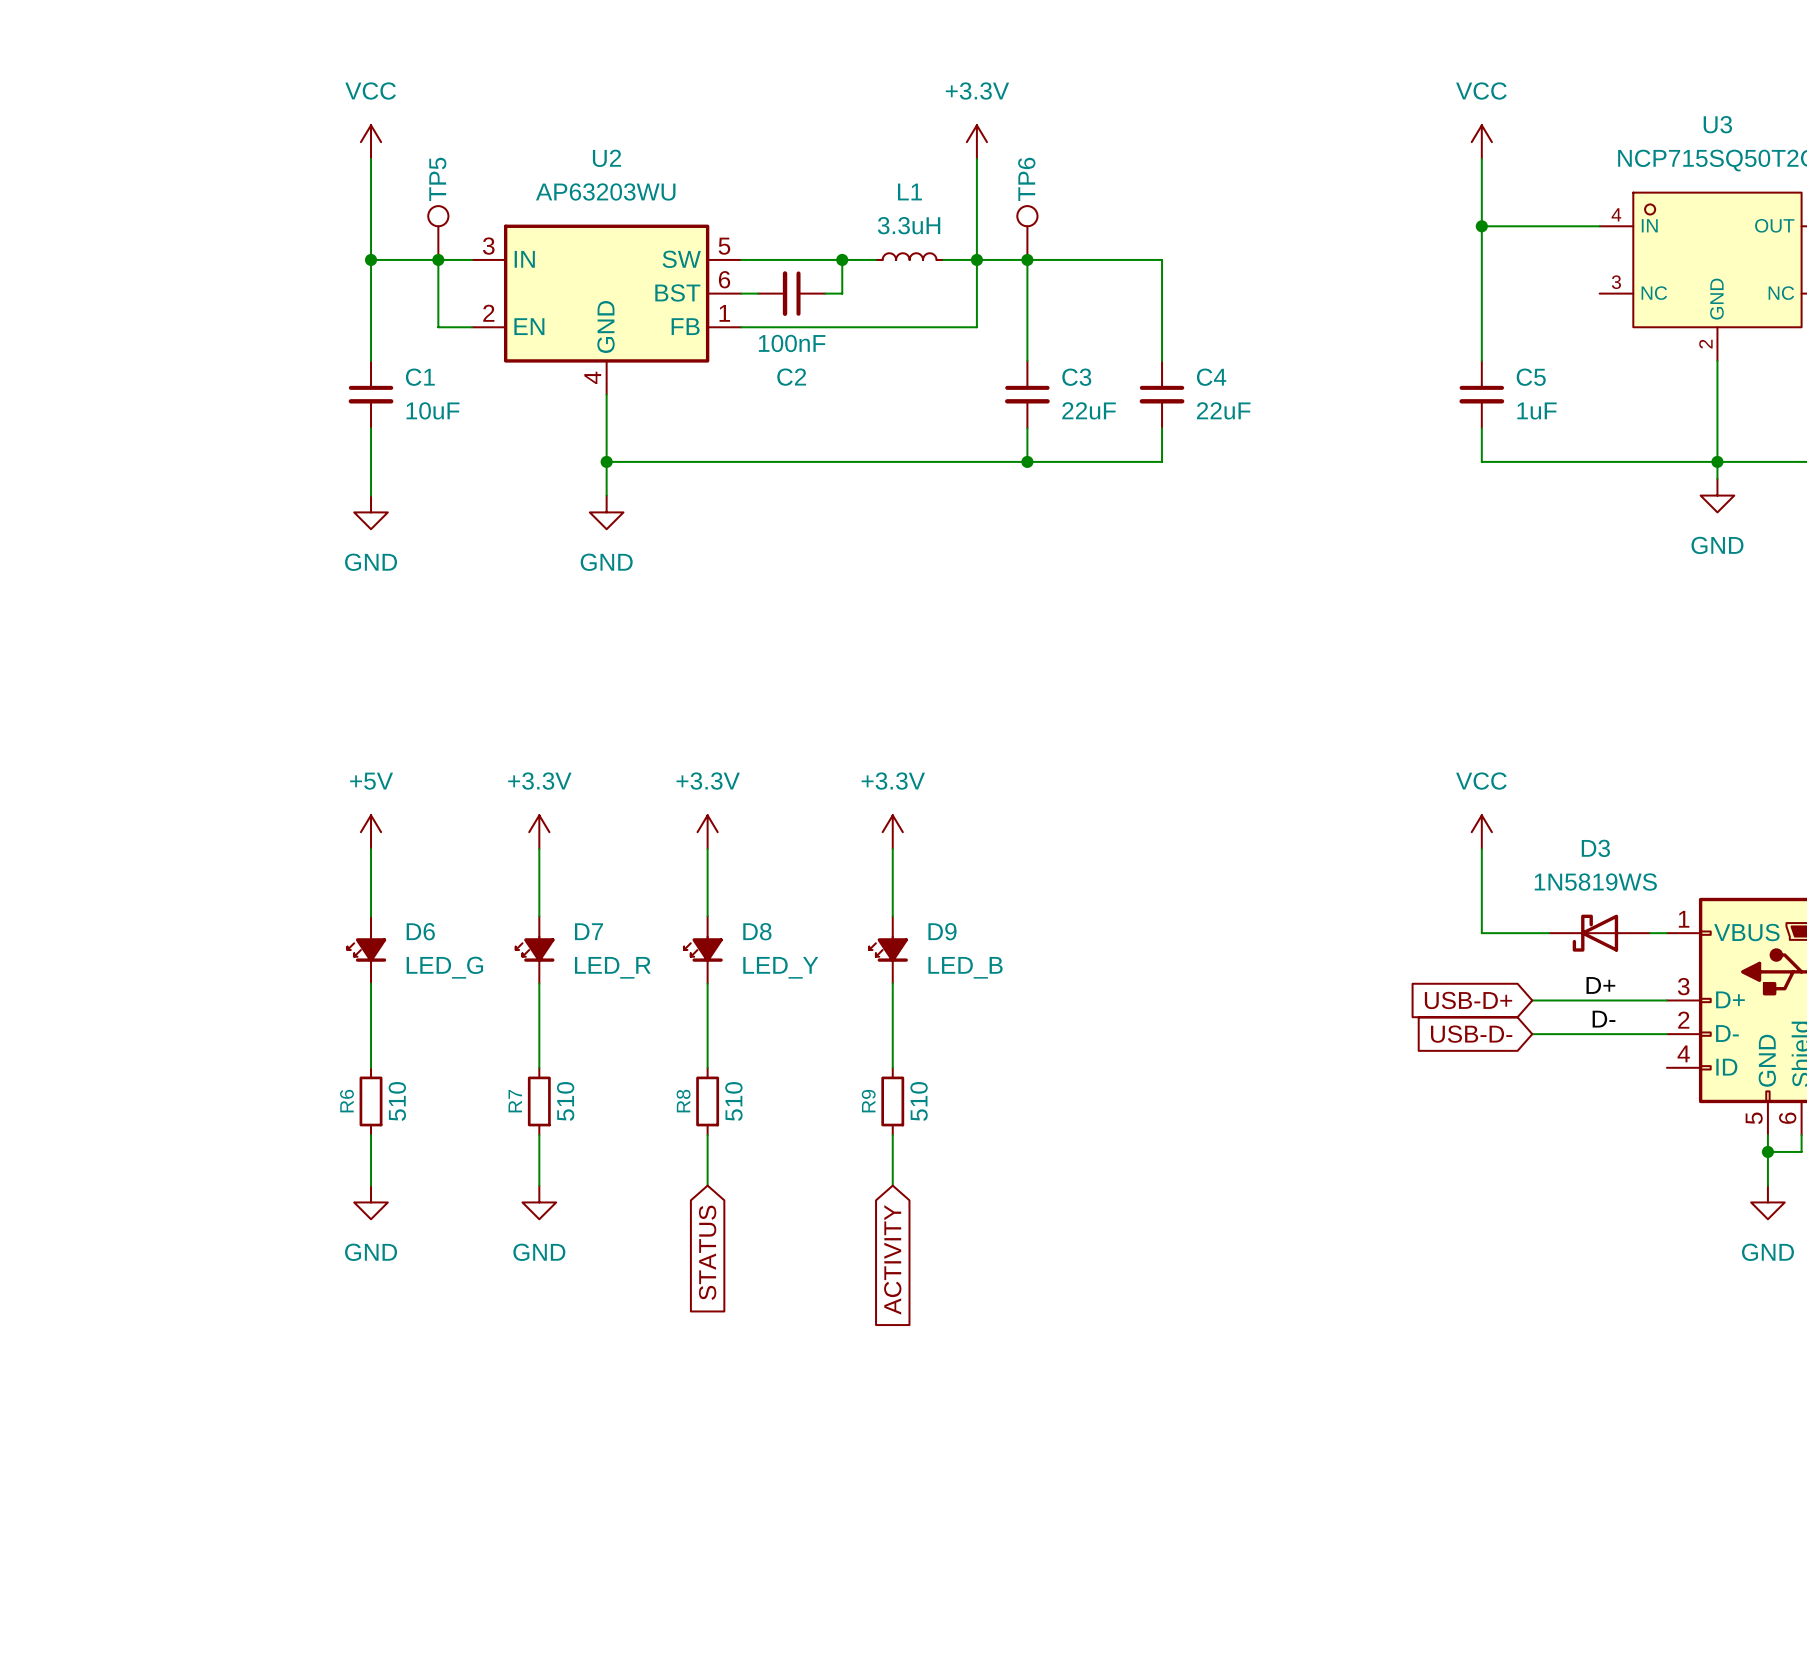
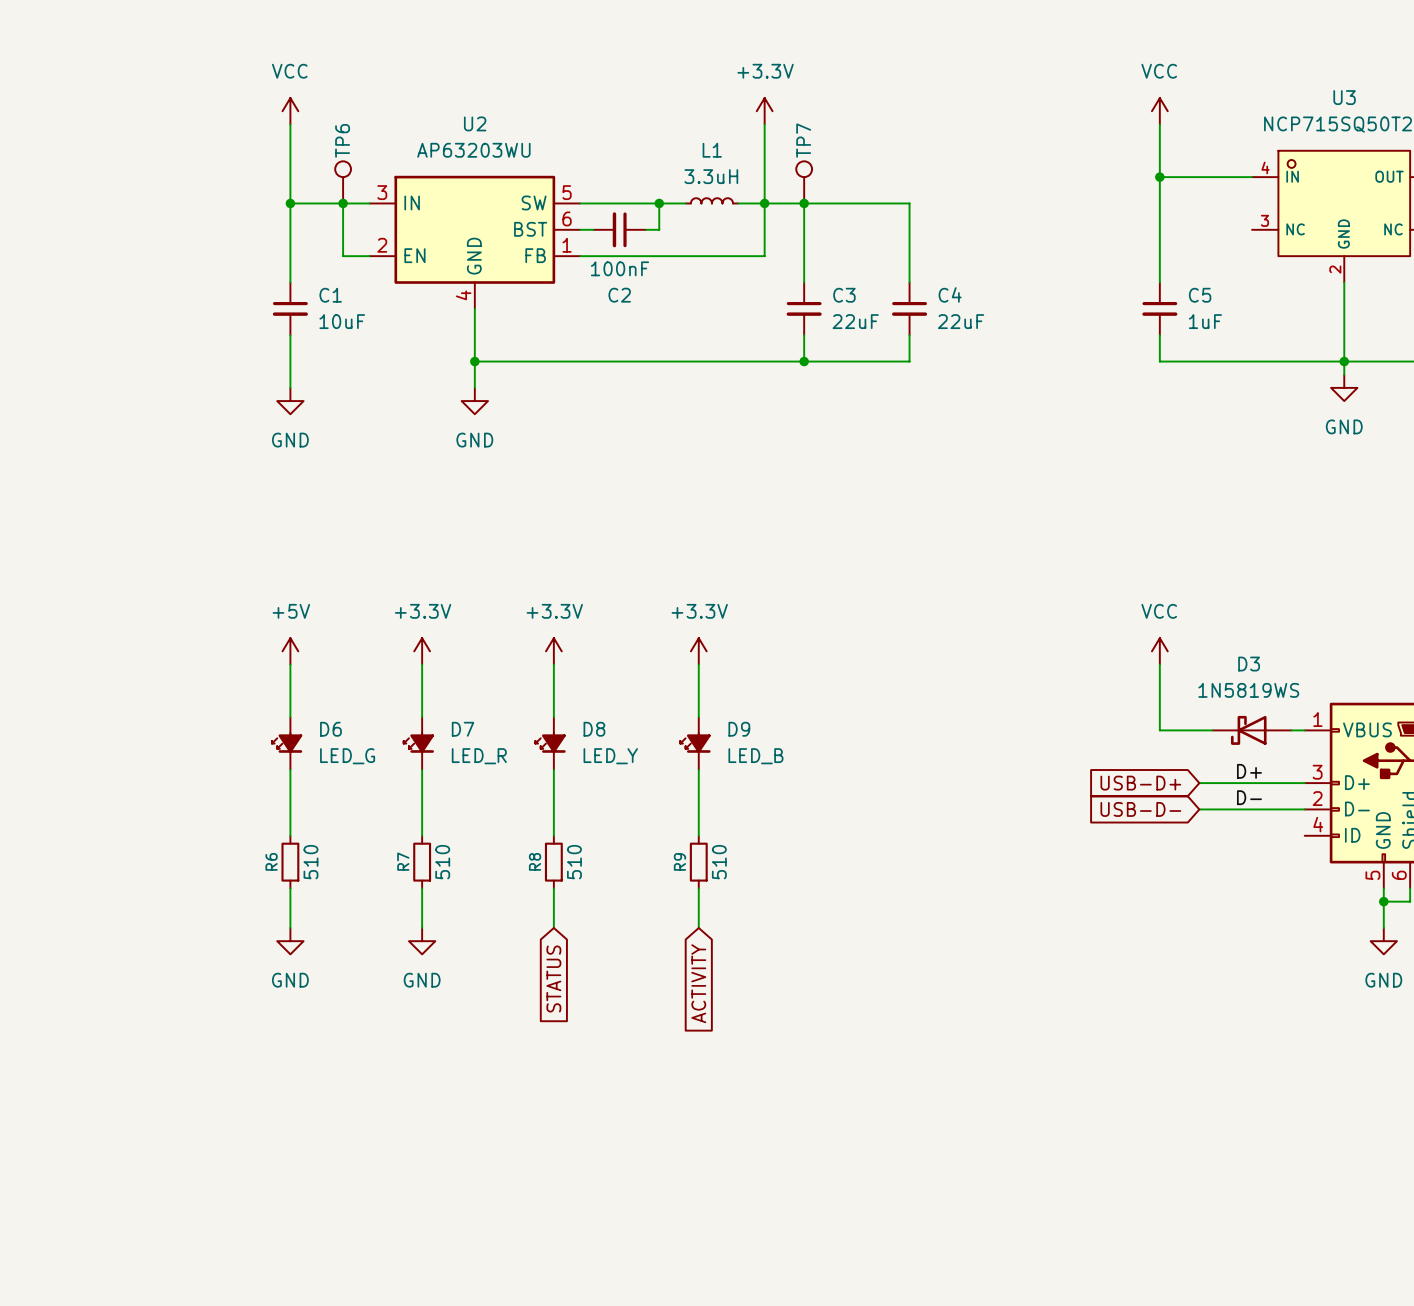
TP5 name: TP5 (437, 179) -> TP6 (342, 140)
TP6 name: TP6 (1026, 179) -> TP7 (803, 140)

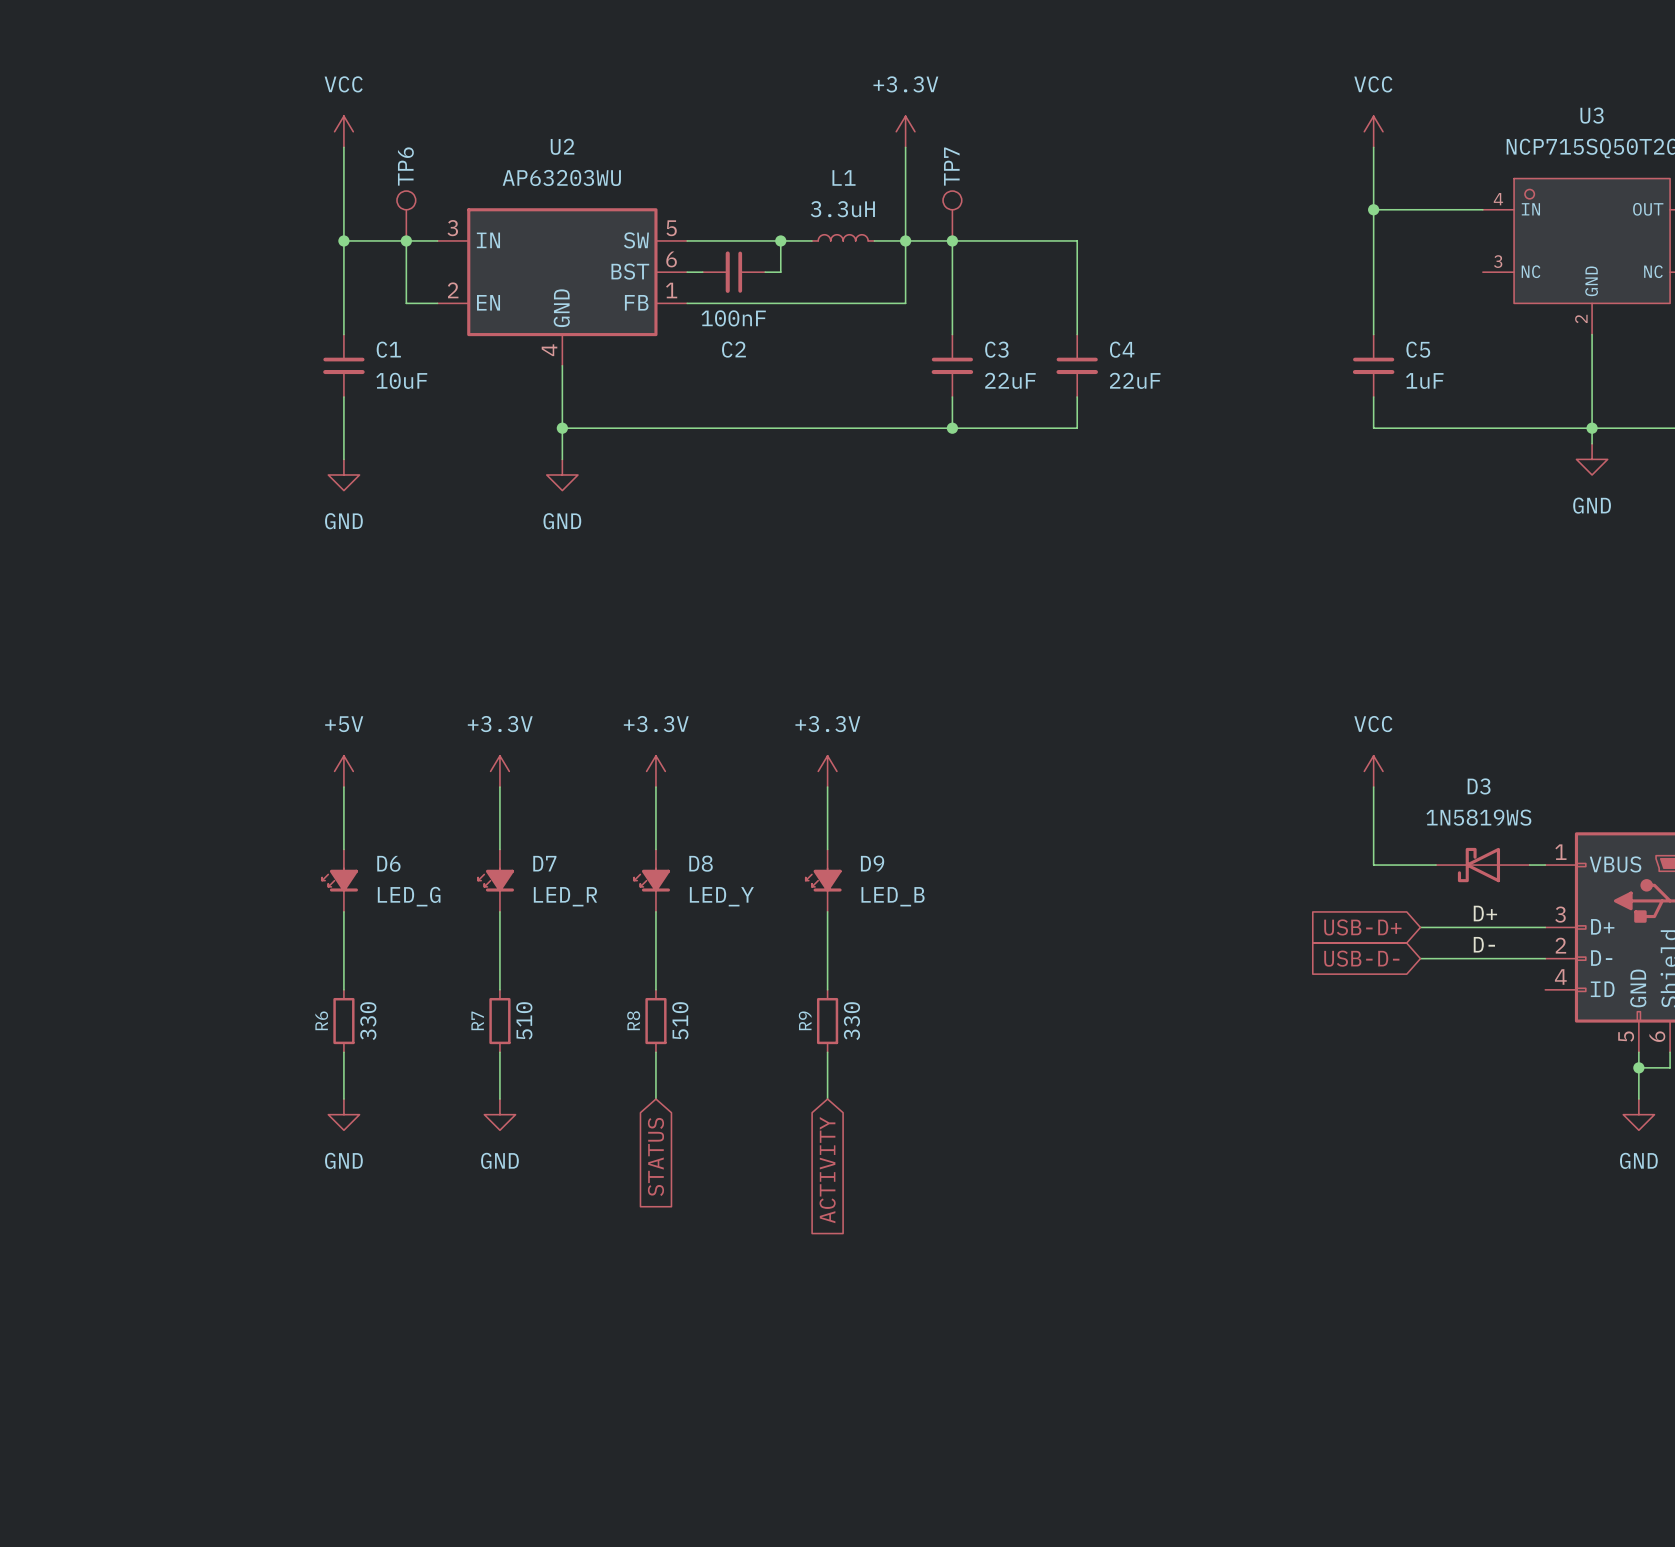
R6 value: 510 (310, 862) -> 330 (368, 1021)
R9 value: 510 (719, 862) -> 330 (851, 1021)

